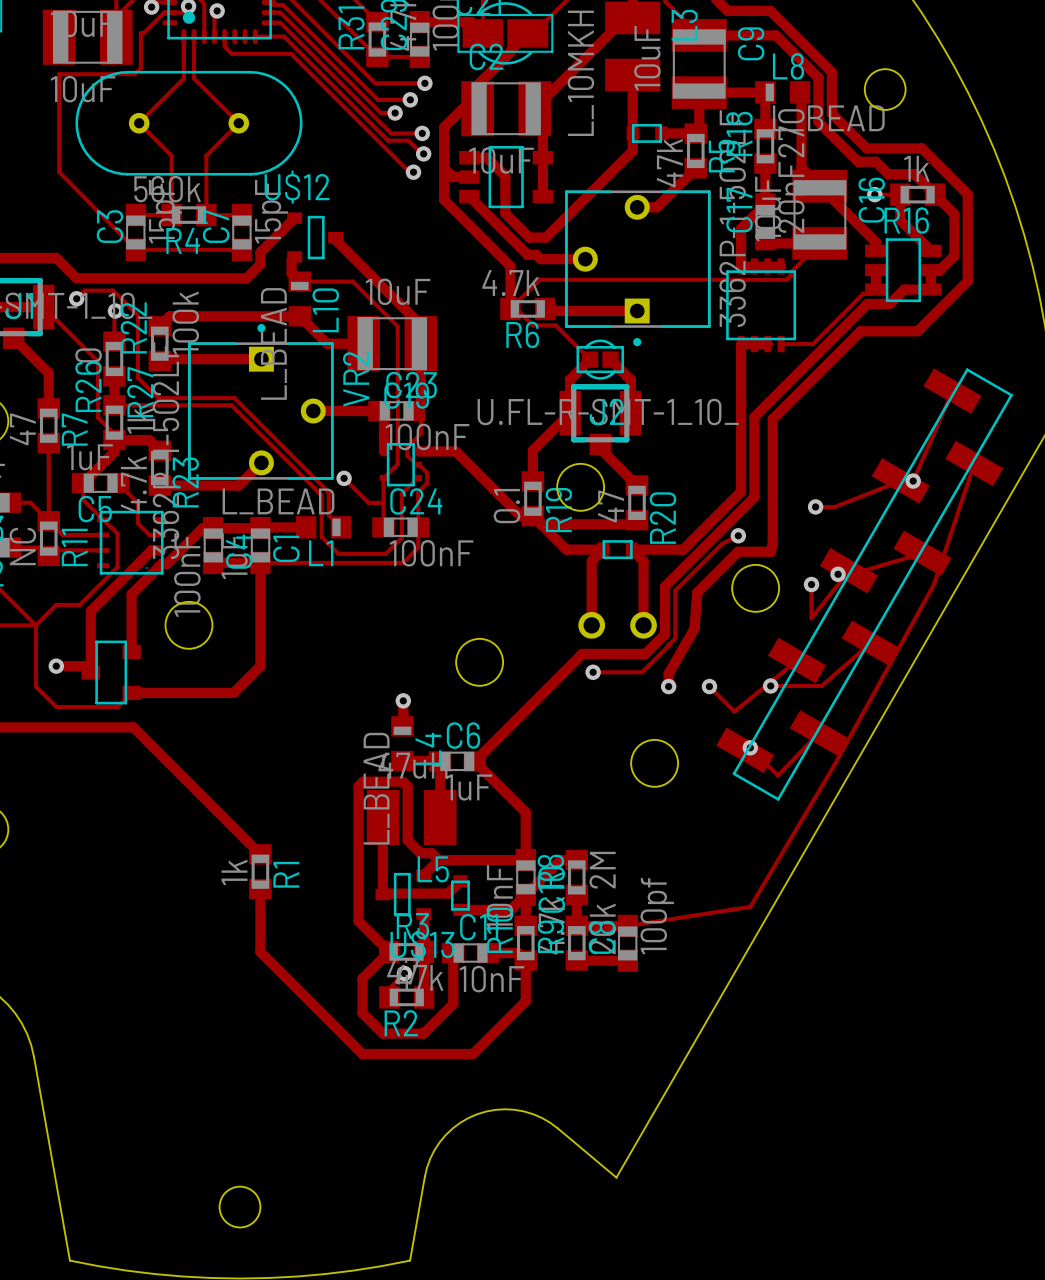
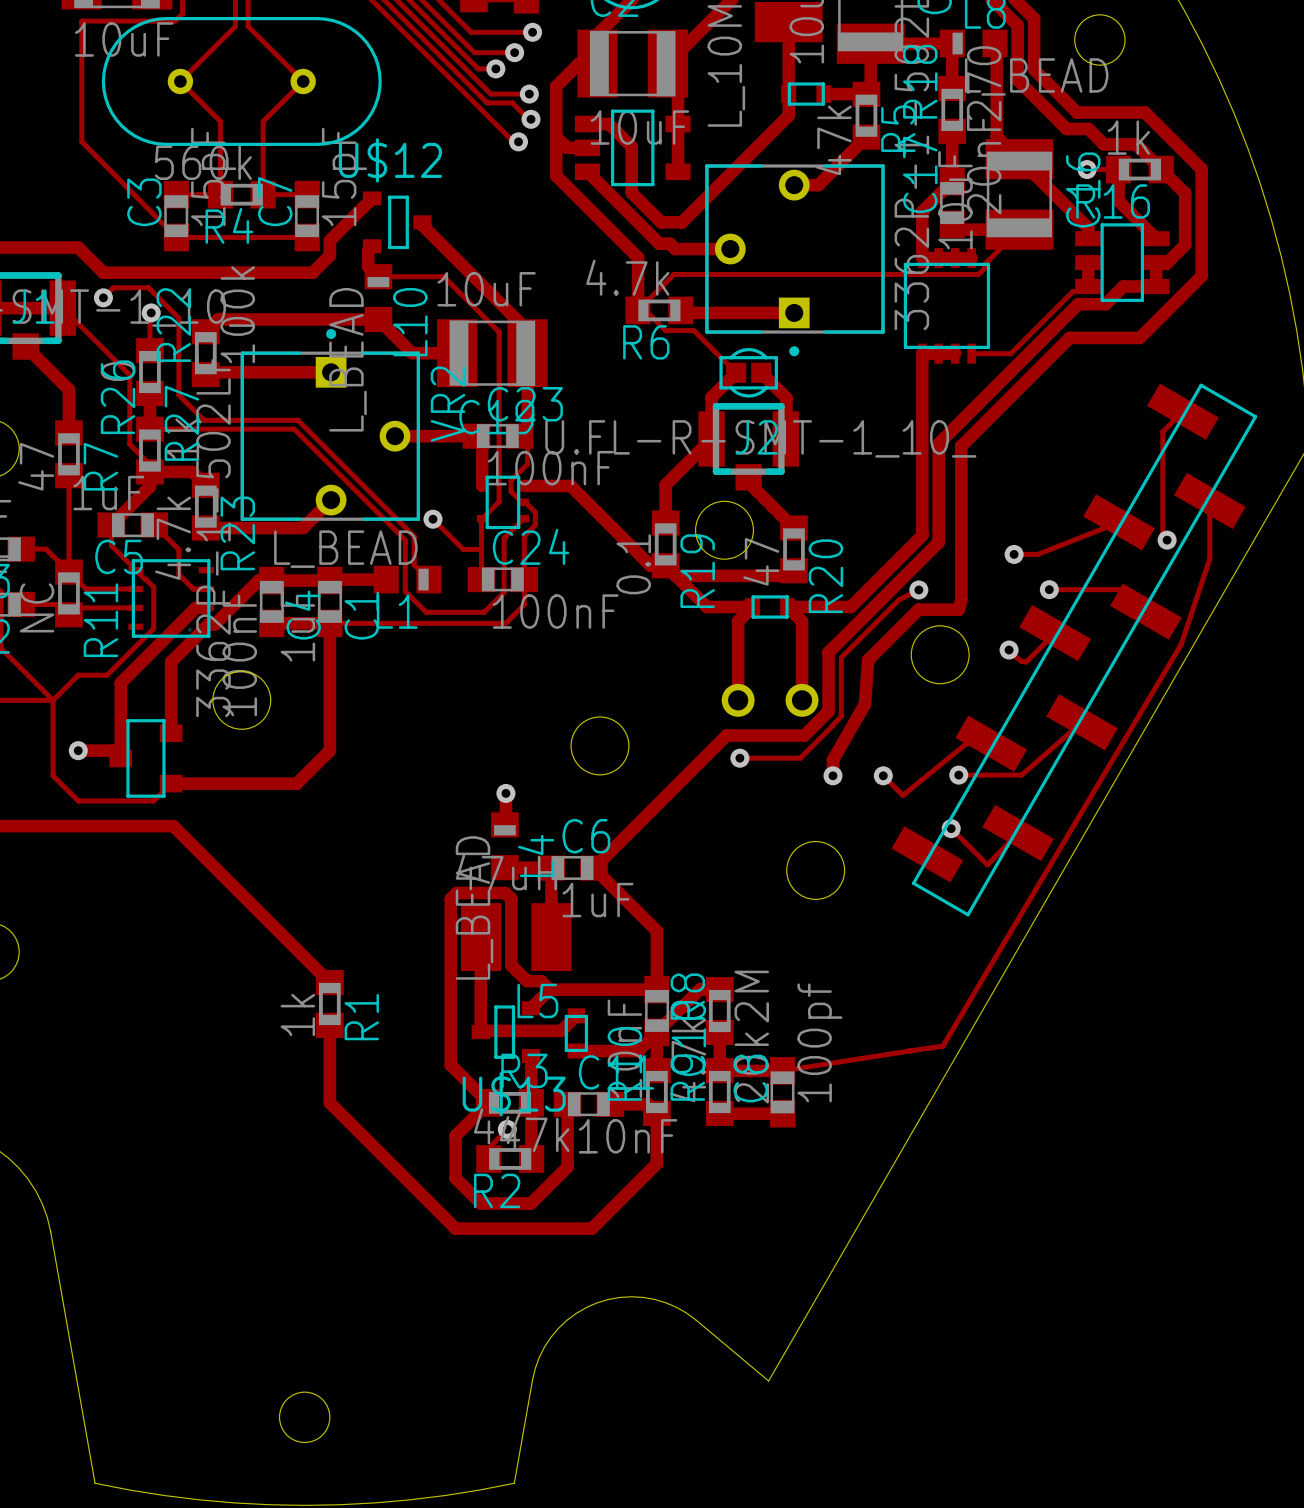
track: (952, 391) (913, 481) -> (1182, 411) (1162, 431) (1162, 535) (1167, 540)
track: (974, 463) (933, 584) (833, 766) (750, 907) -> (1209, 501) (1209, 558) (1181, 644) (942, 1046) (933, 1047)
via position: (913, 481) -> (1167, 540)
track: (922, 553) (851, 574) (838, 574) -> (1145, 611) (1123, 589) (1049, 589)
track: (848, 570) (811, 618) (811, 584) -> (1055, 633) (1026, 662) (1021, 661) (1009, 650)
via position: (838, 574) -> (1049, 589)
track: (797, 660) (734, 711) (725, 702) -> (991, 743) (966, 743) (902, 795)
track: (750, 747) (778, 775) (794, 758) -> (951, 828) (987, 864)
via position: (750, 747) -> (951, 828)

